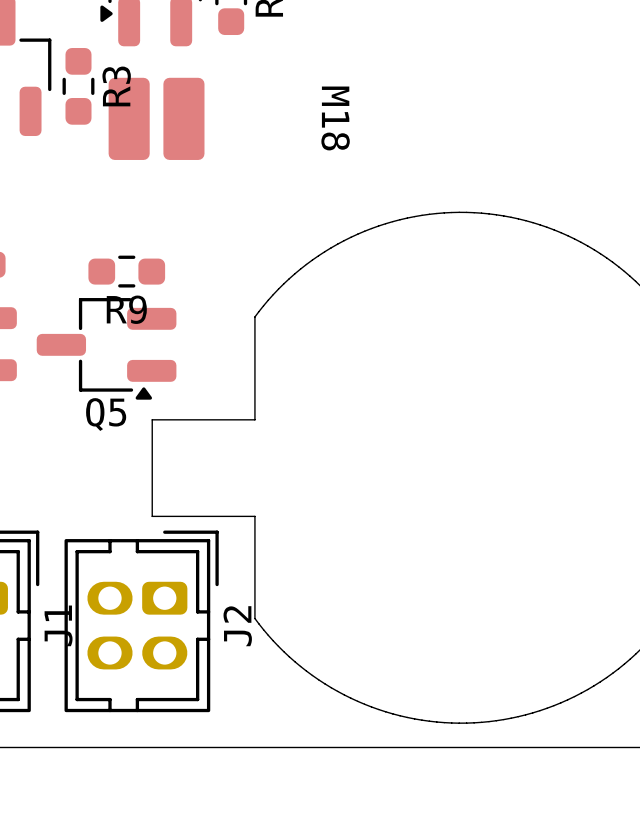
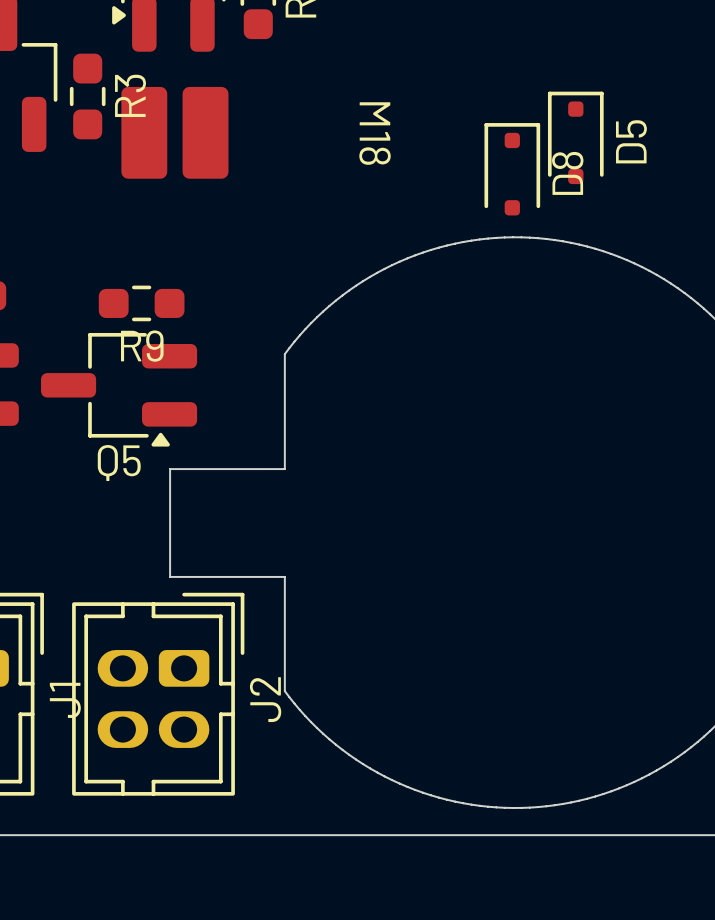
D5: none -> (575, 137)
D8: none -> (512, 169)

